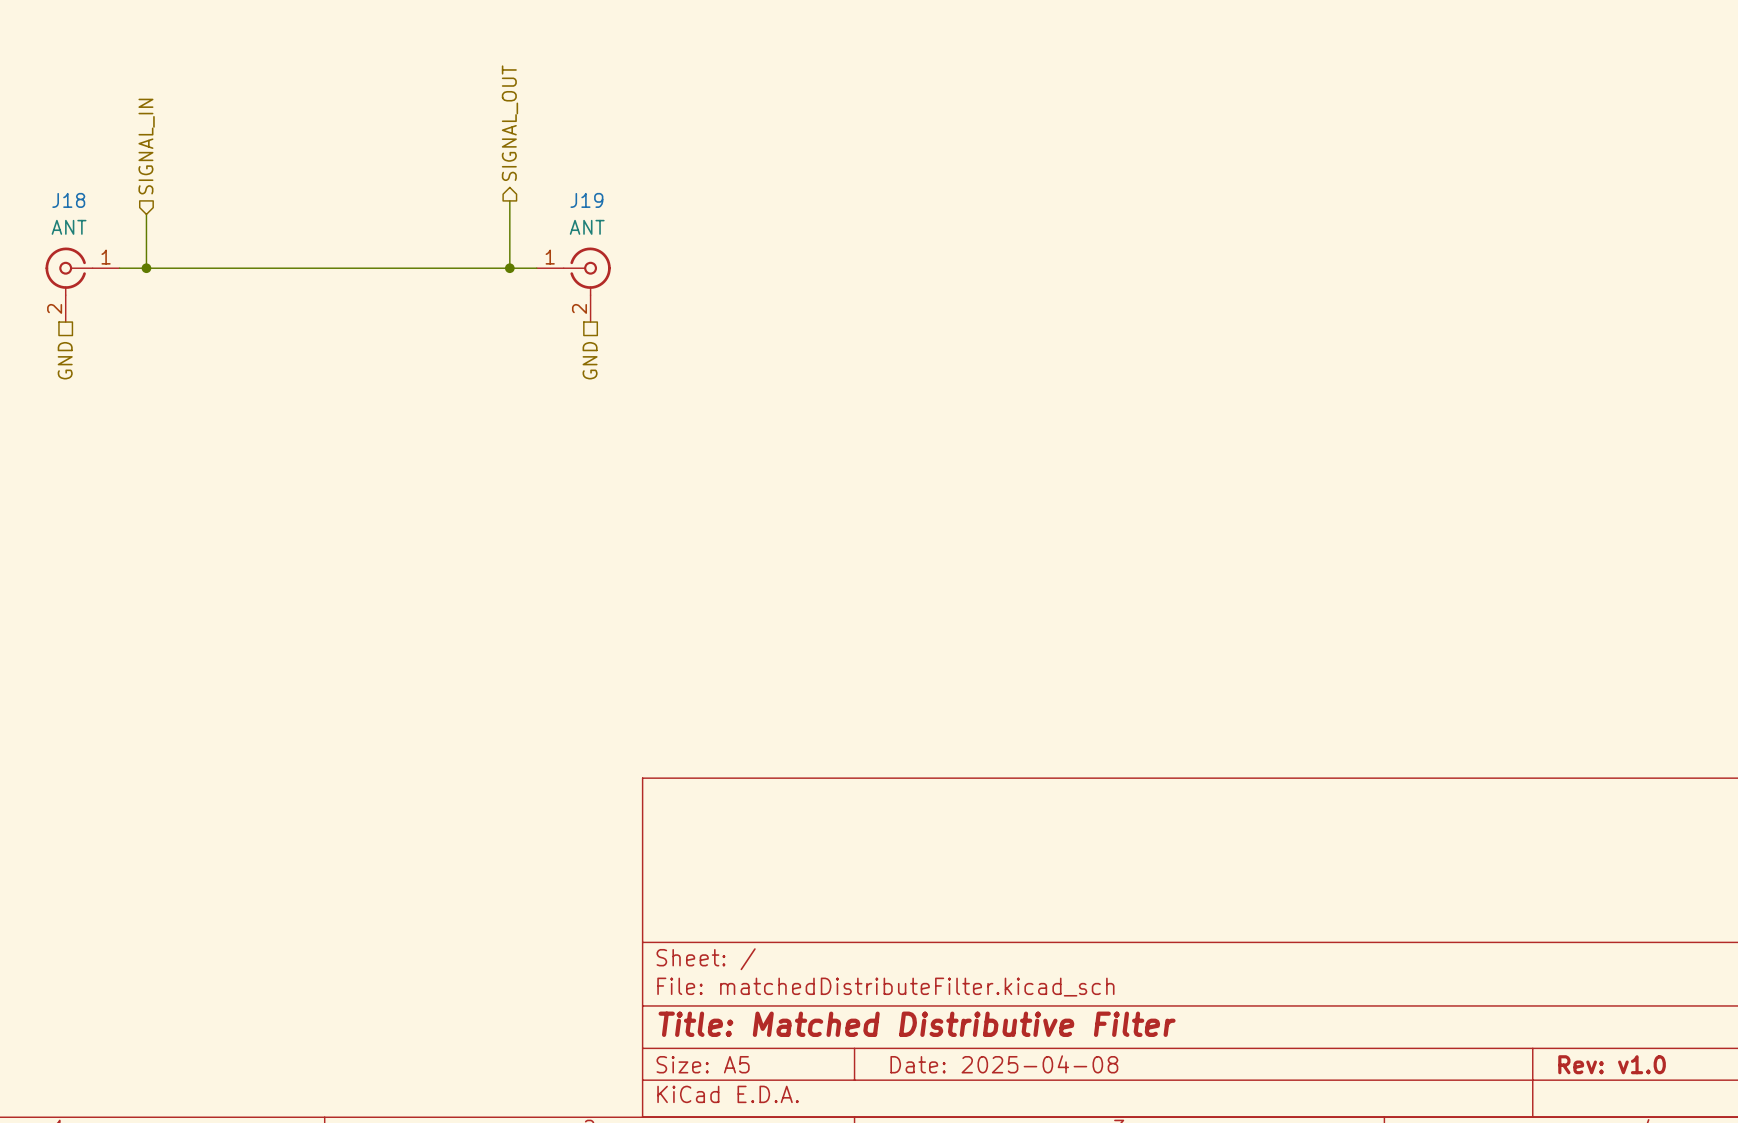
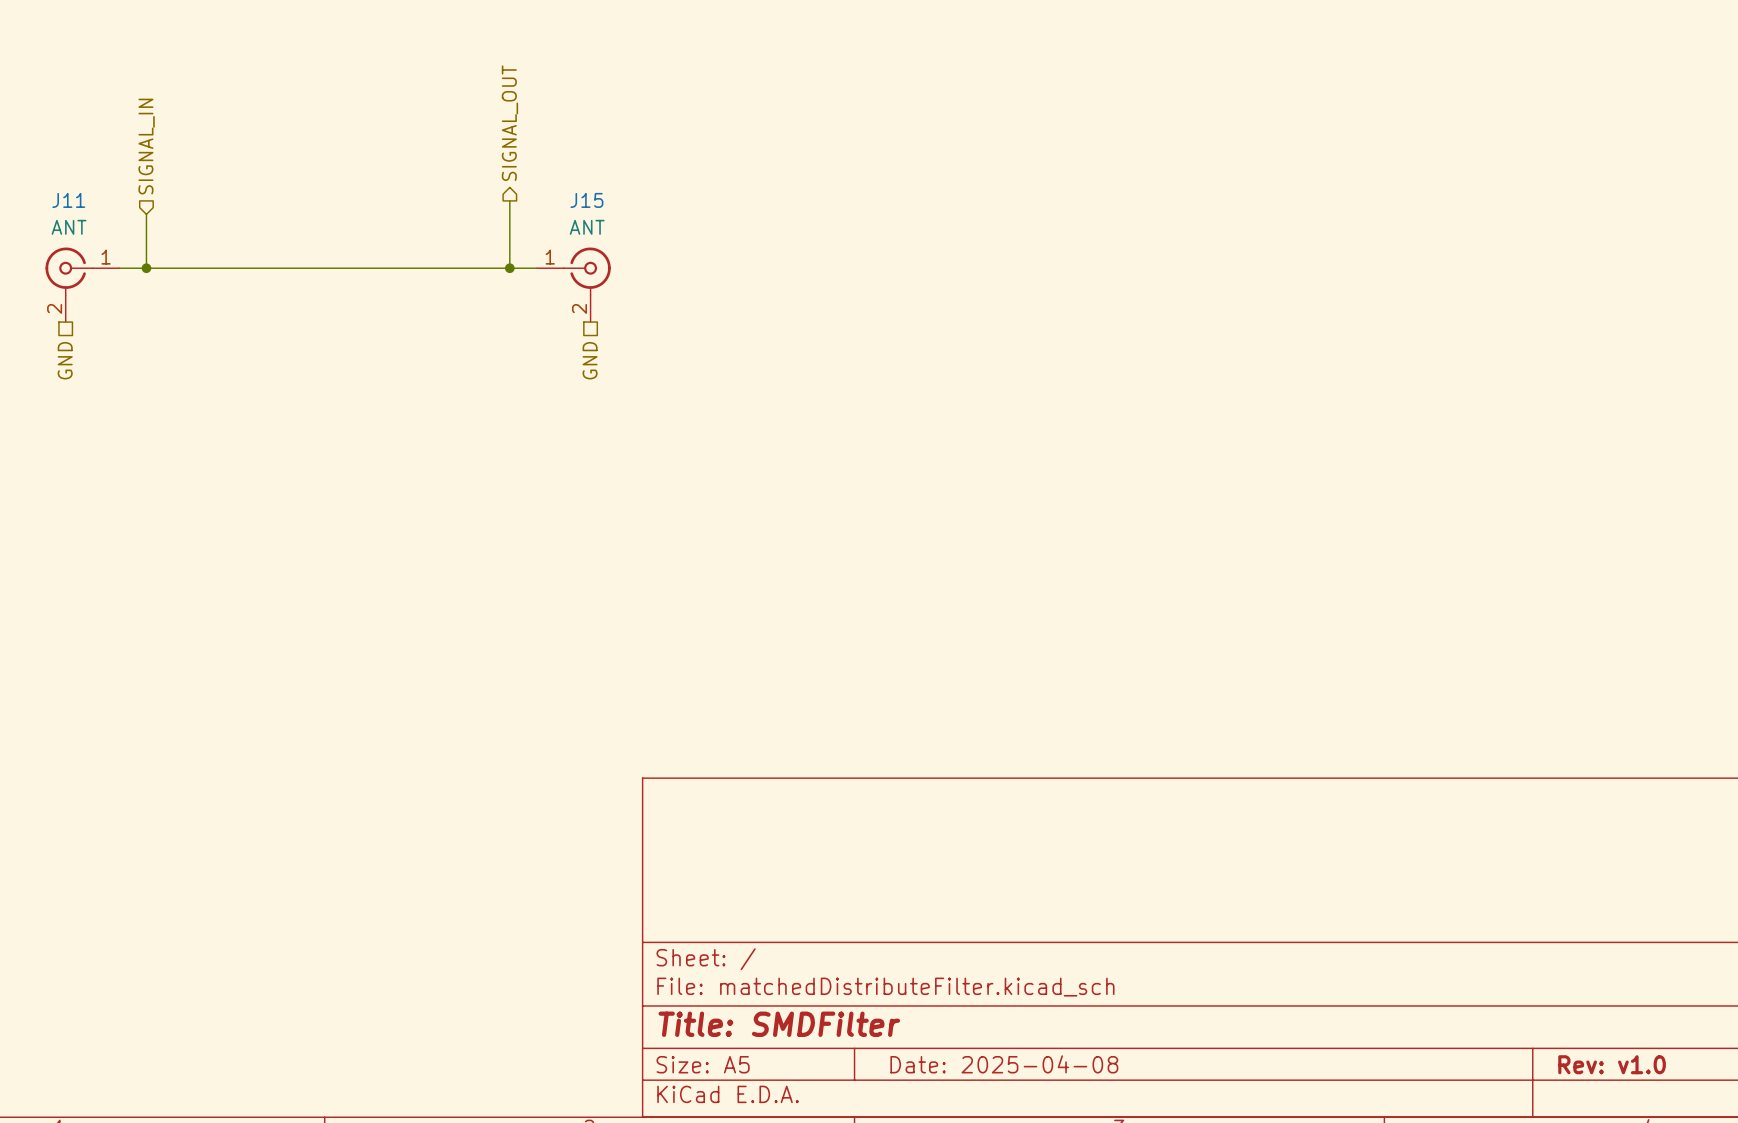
J18 name: J18 (68, 200) -> J11 (68, 200)
J19 name: J19 (586, 200) -> J15 (586, 200)
title block: Title: Matched Distributive Filter (917, 1024) -> Title: SMDFilter (779, 1024)

